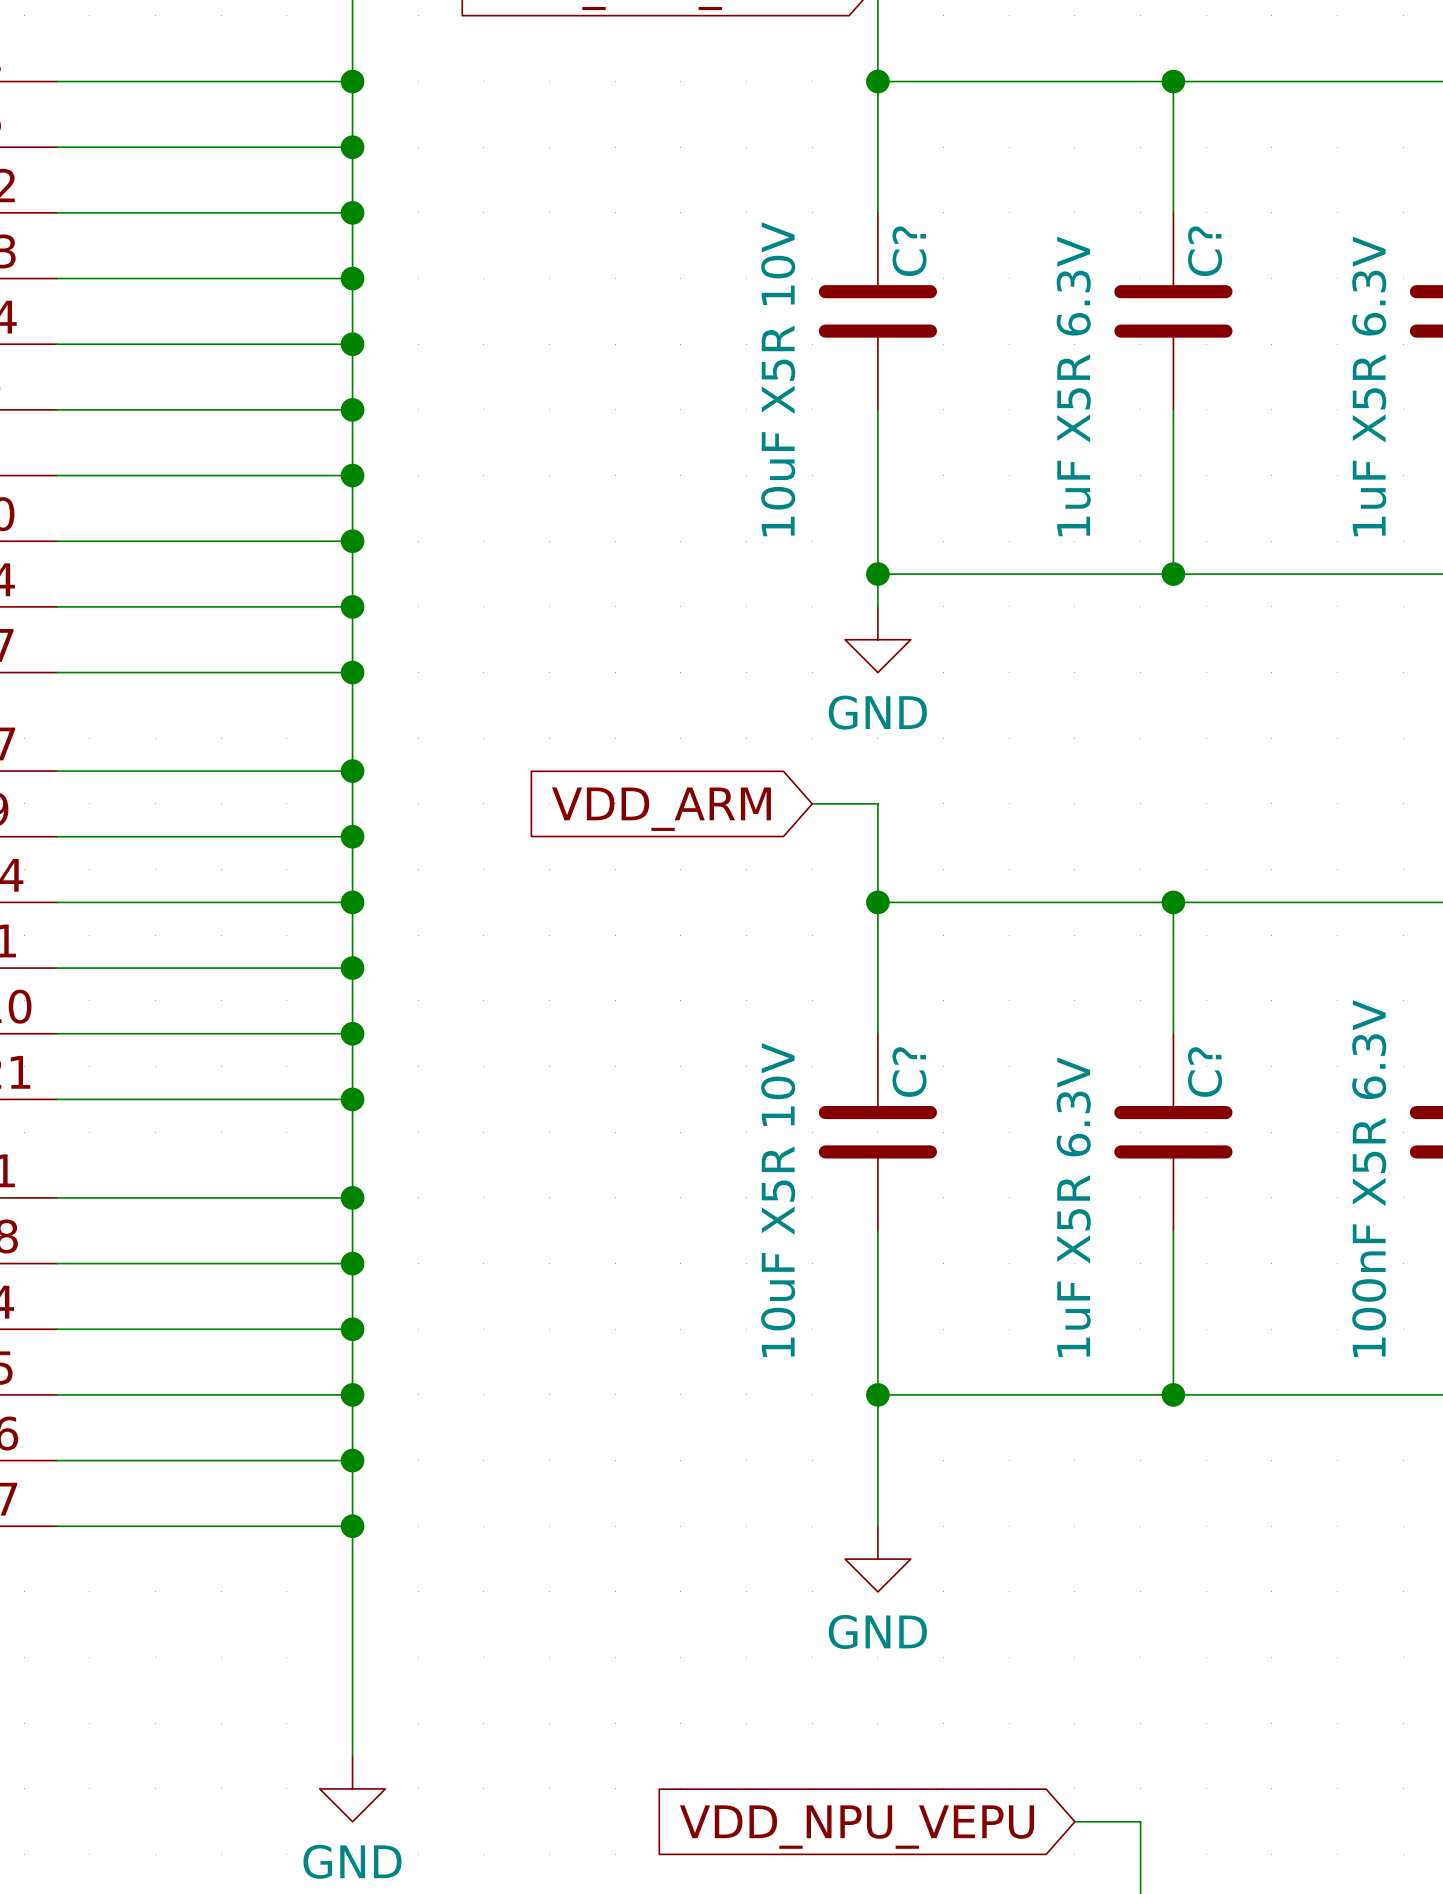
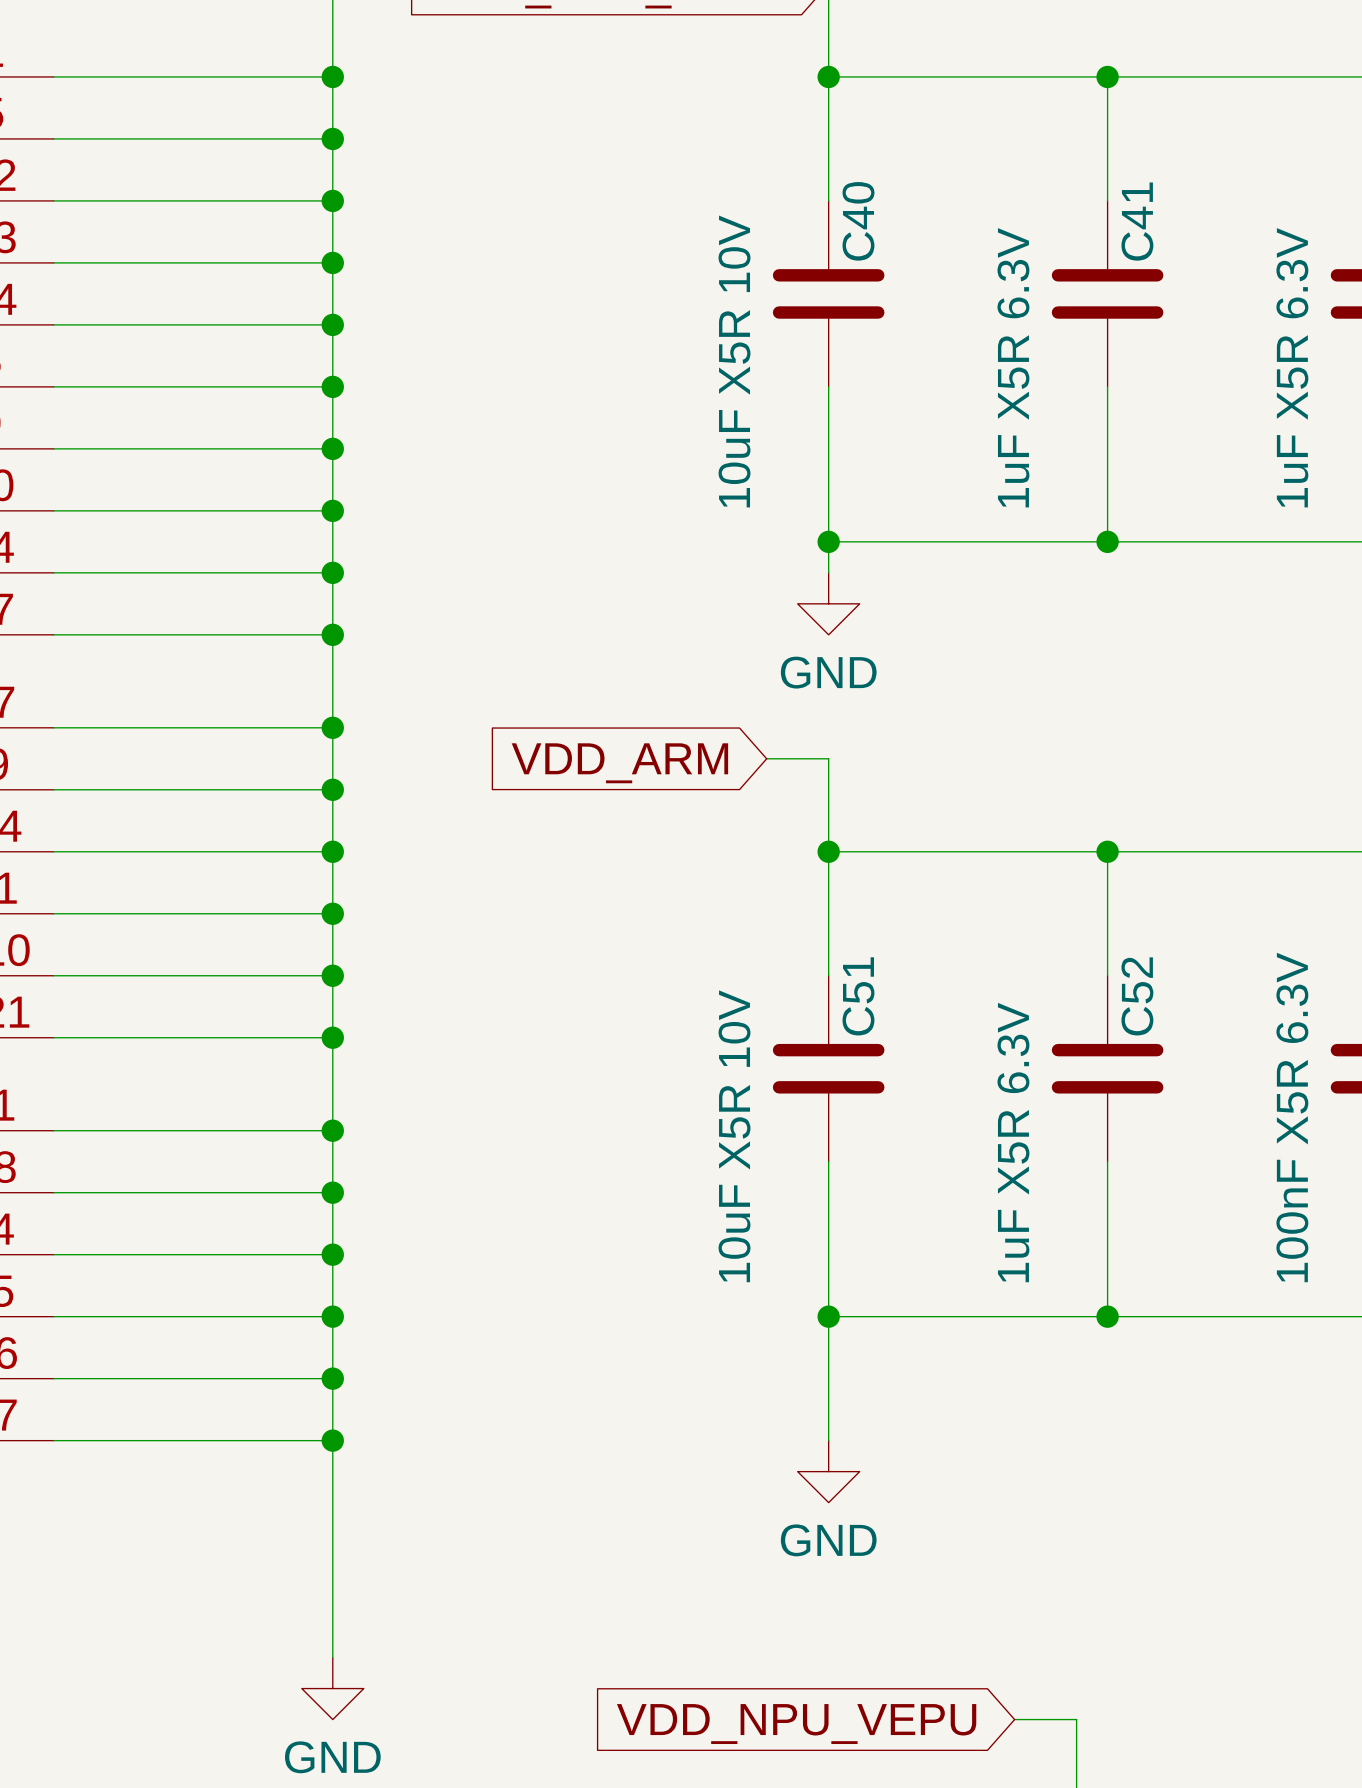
C? name: C? (909, 251) -> C40 (858, 221)
C? name: C? (1205, 251) -> C41 (1137, 221)
C? name: C? (909, 1072) -> C51 (858, 996)
C? name: C? (1205, 1072) -> C52 (1137, 996)

